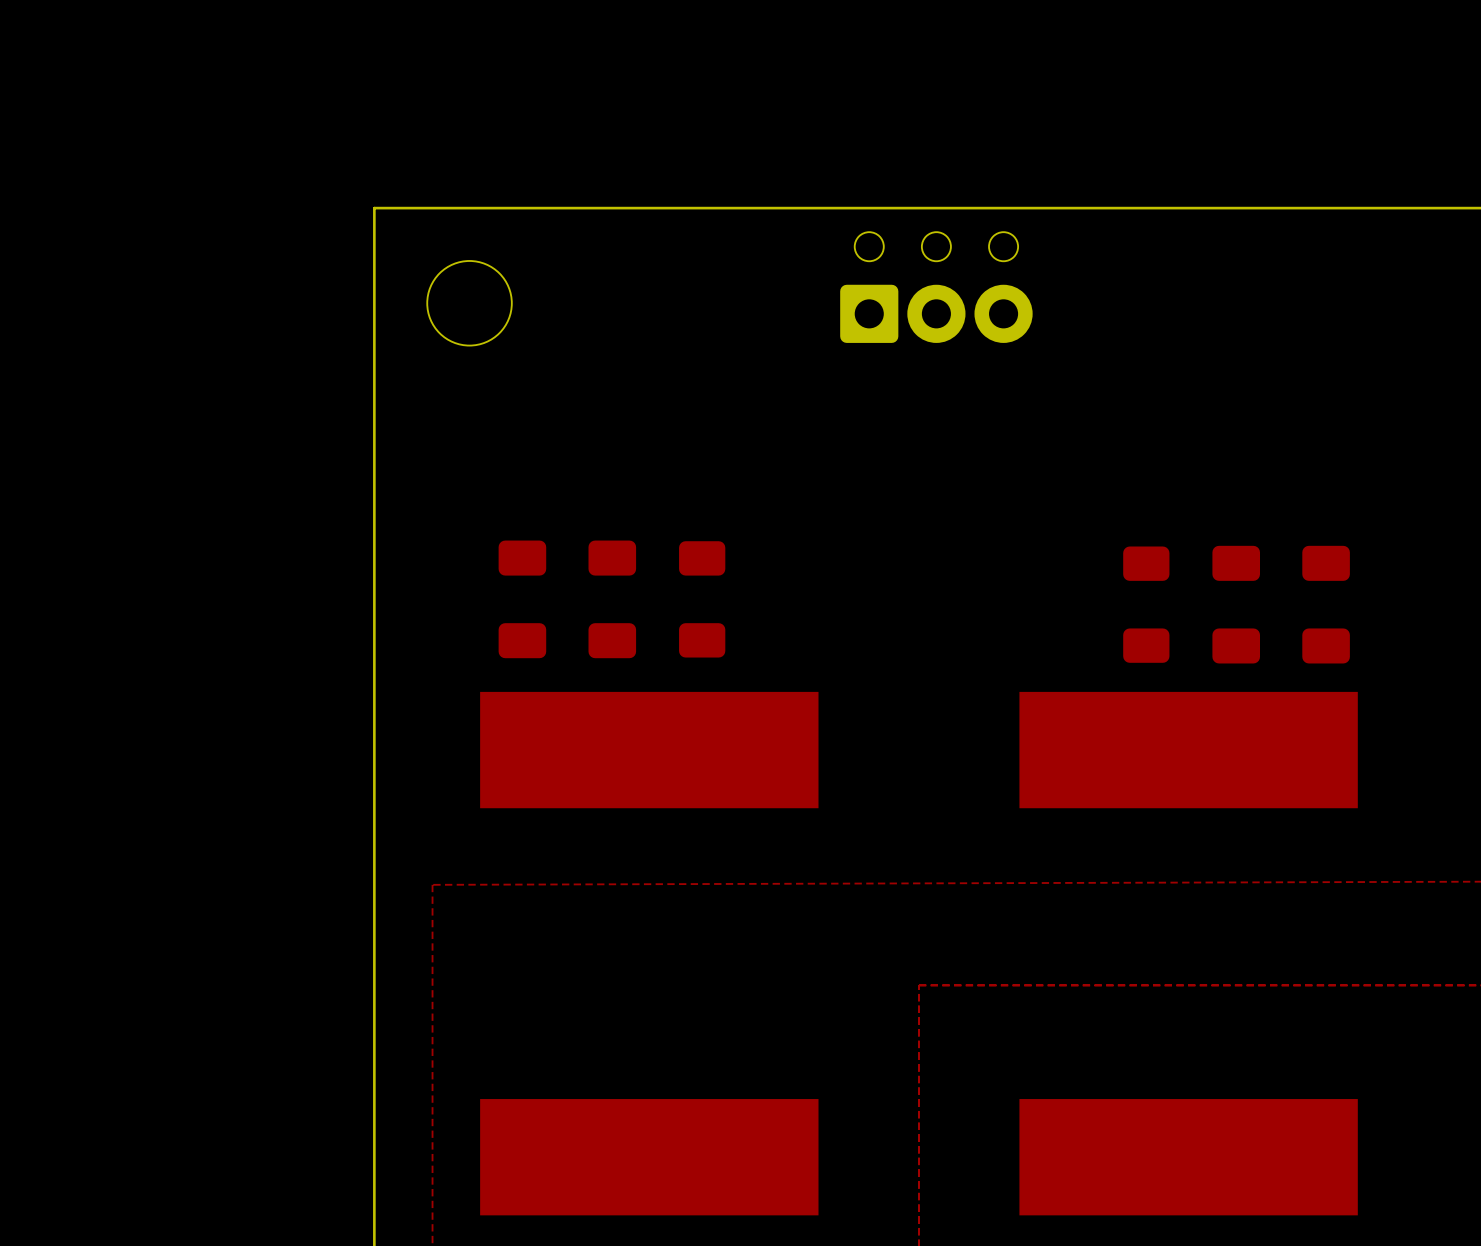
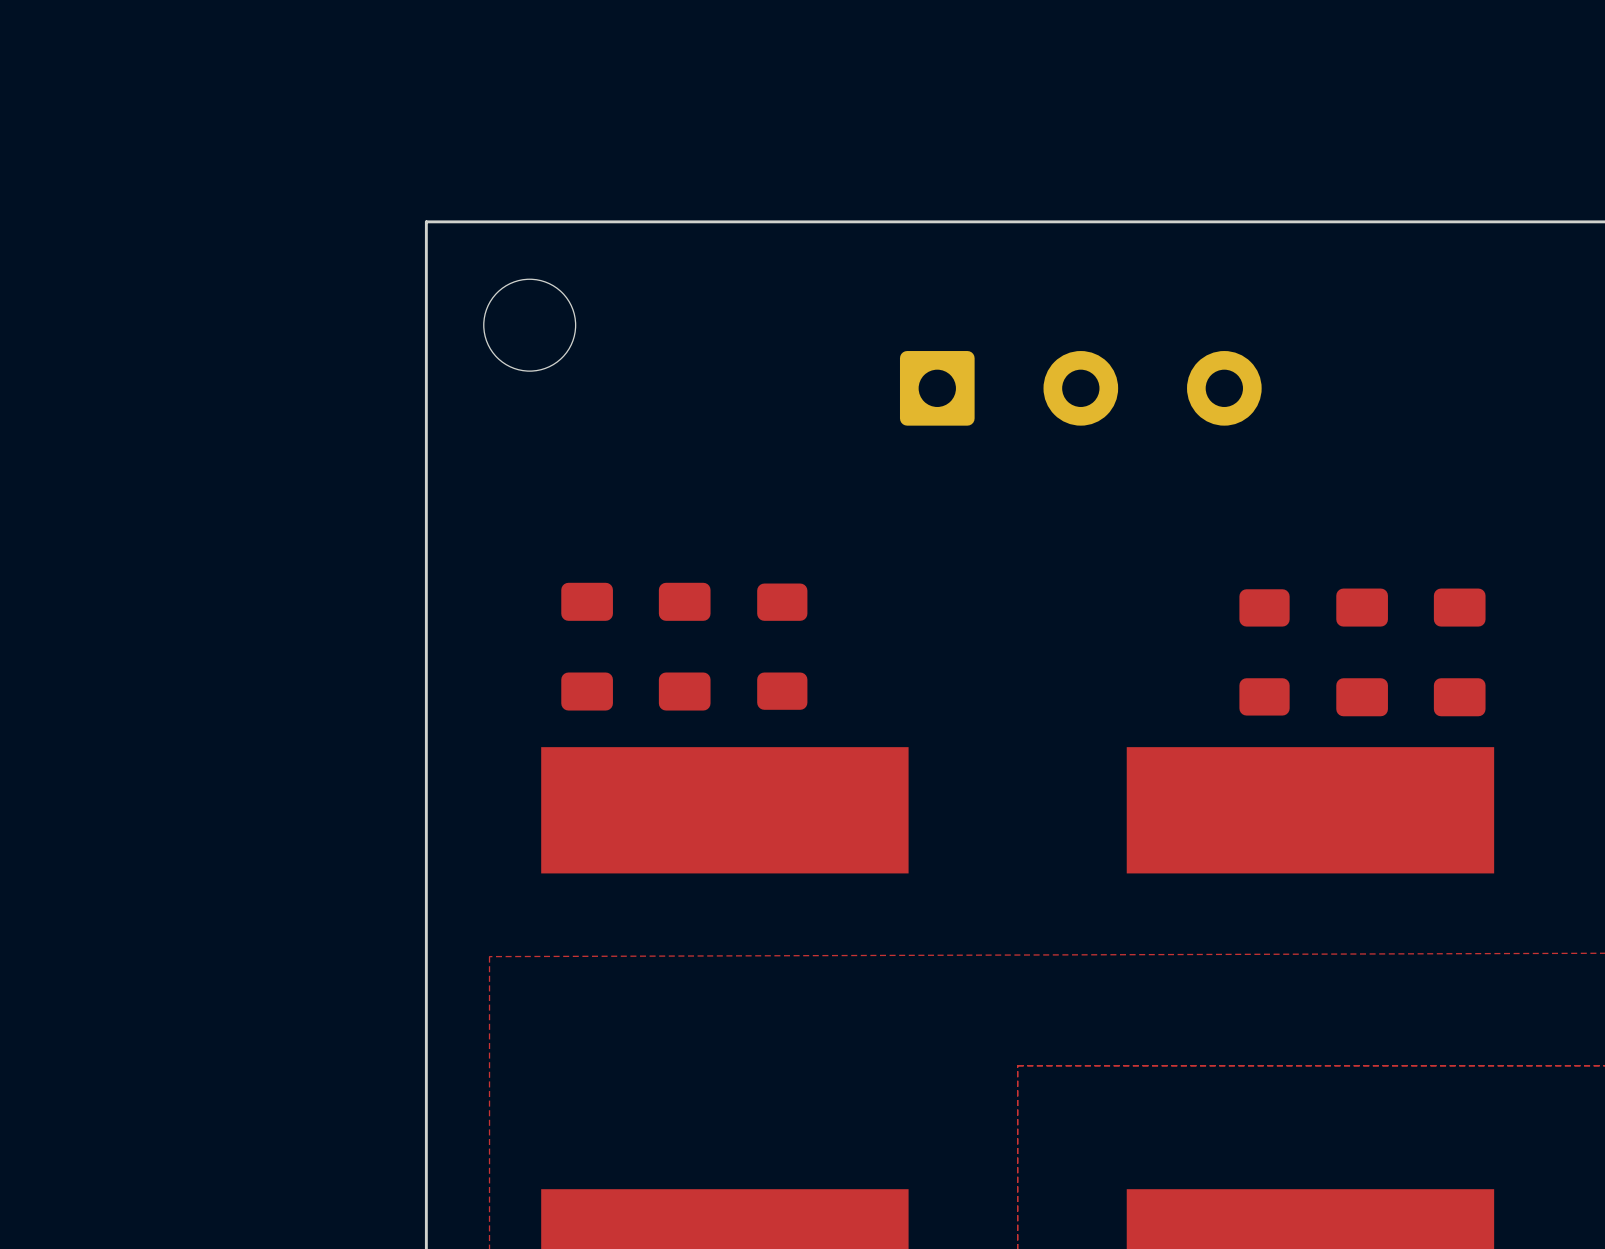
part: (936, 287) -> none
part: none -> (1080, 388)

